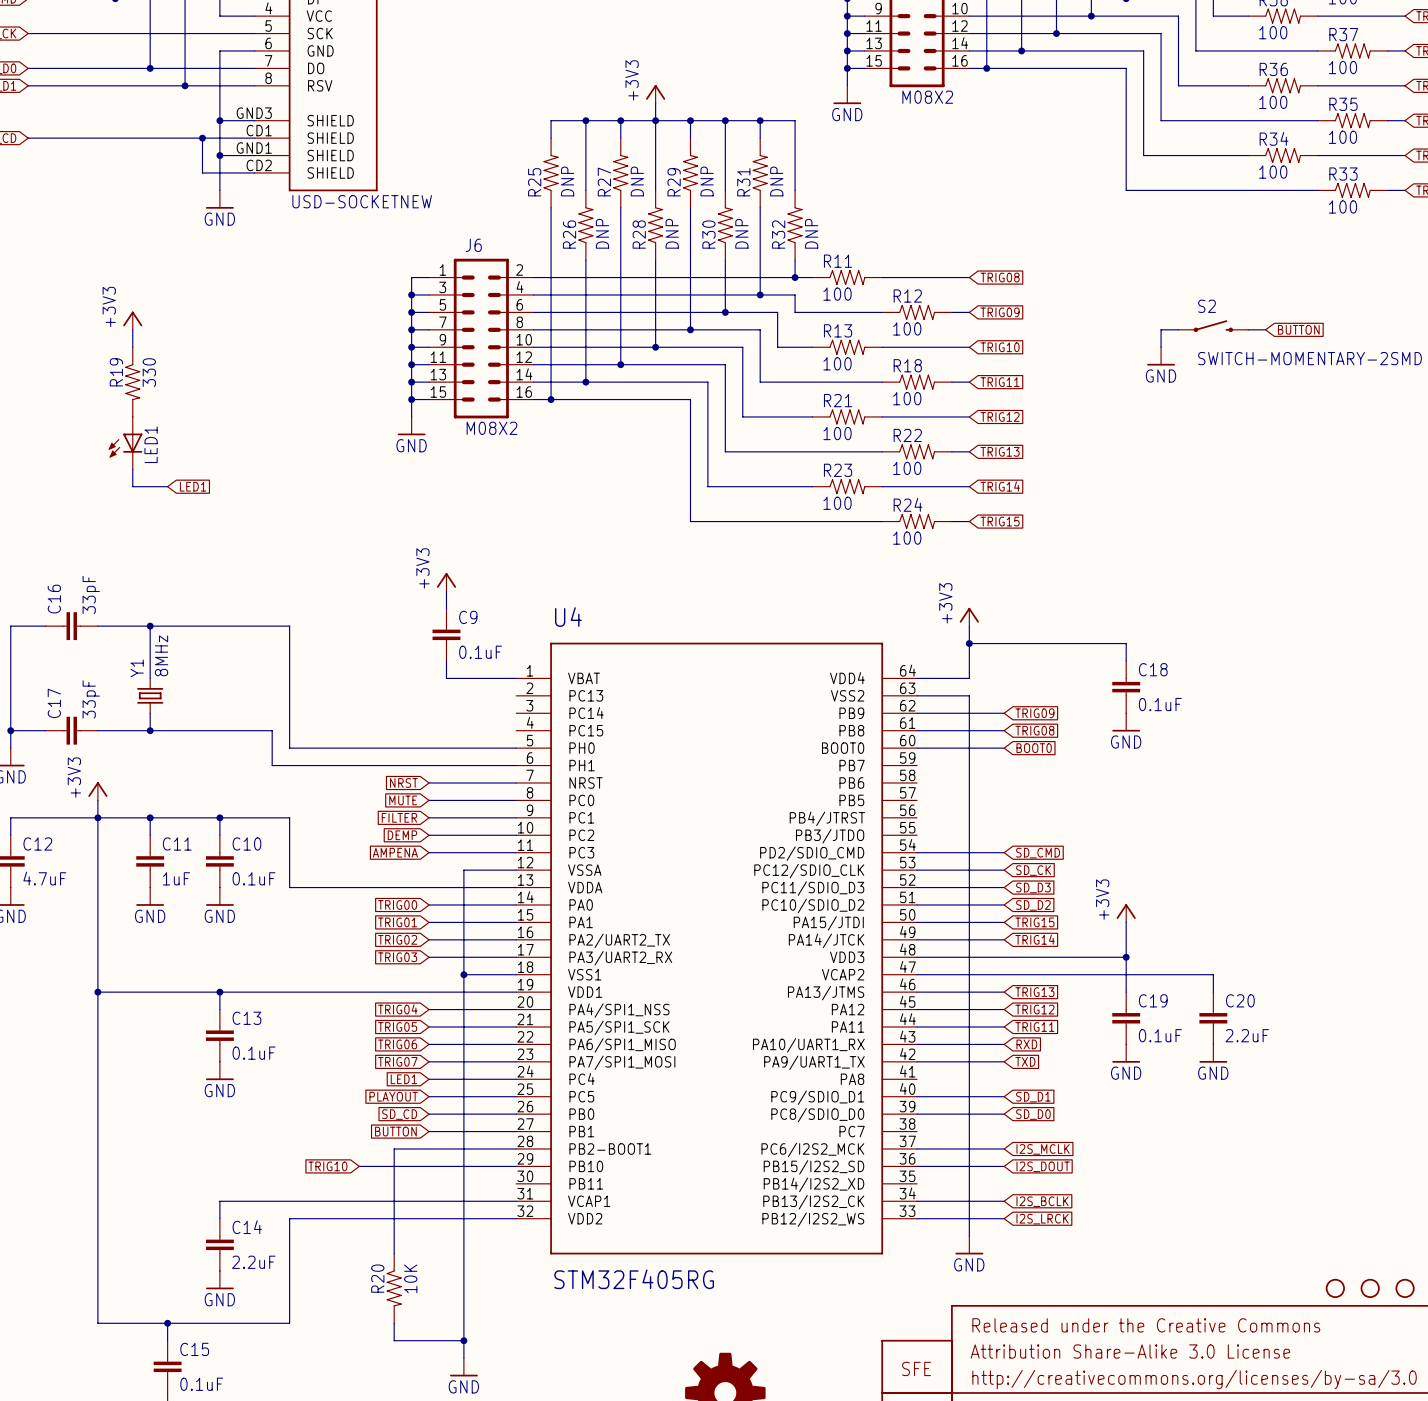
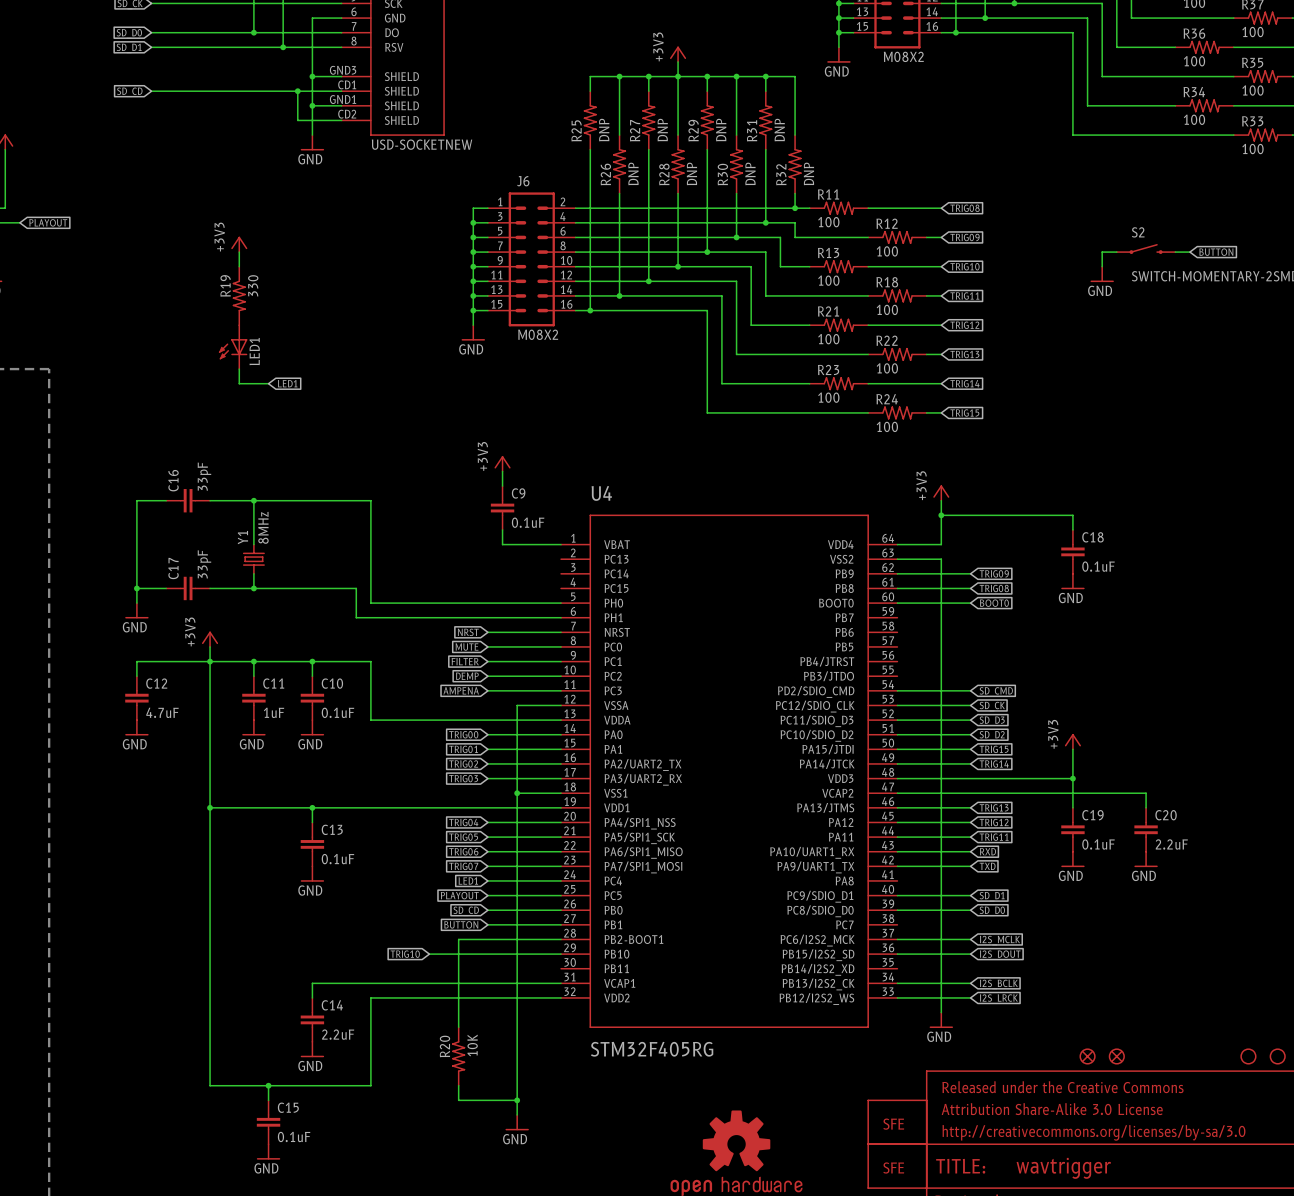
part: none -> (1087, 1056)
part: none -> (1116, 1056)

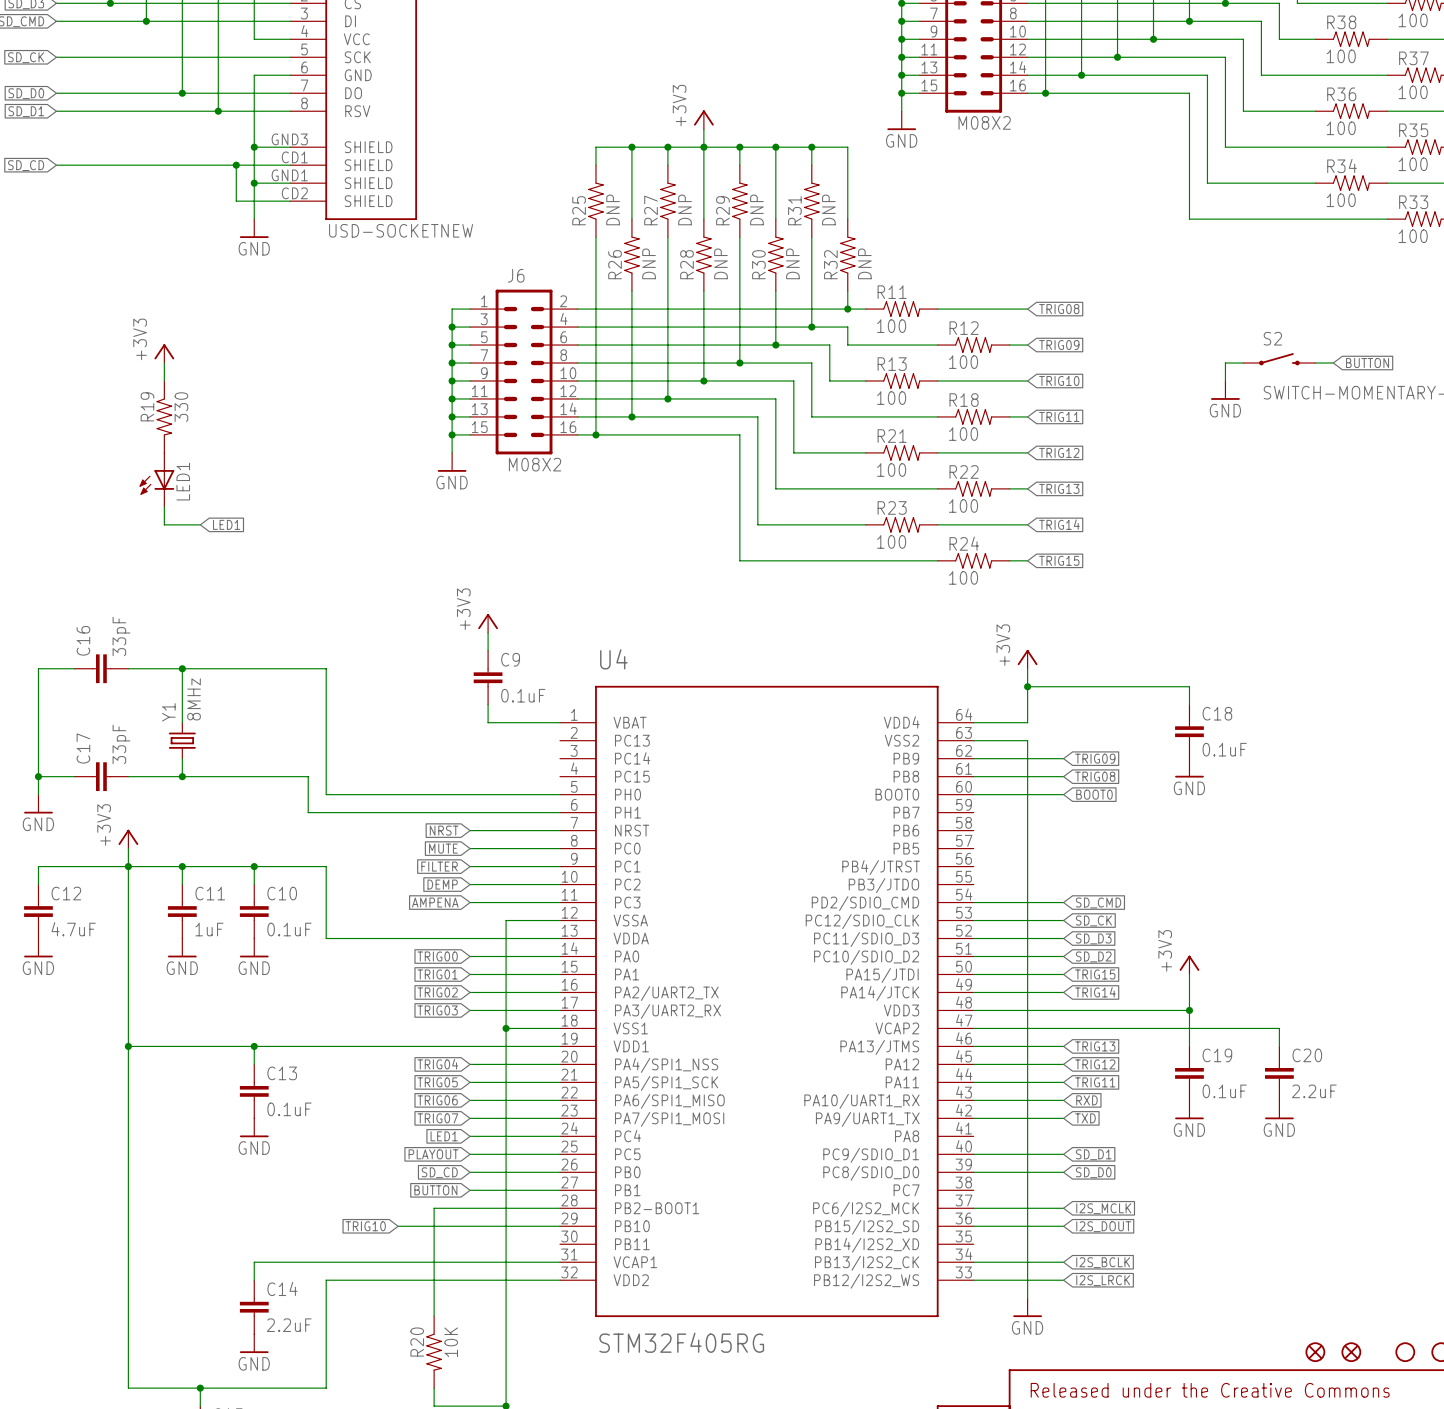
part: (1087, 1056) -> none
part: (1116, 1056) -> none
part: none -> (1315, 1352)
part: none -> (1351, 1352)

